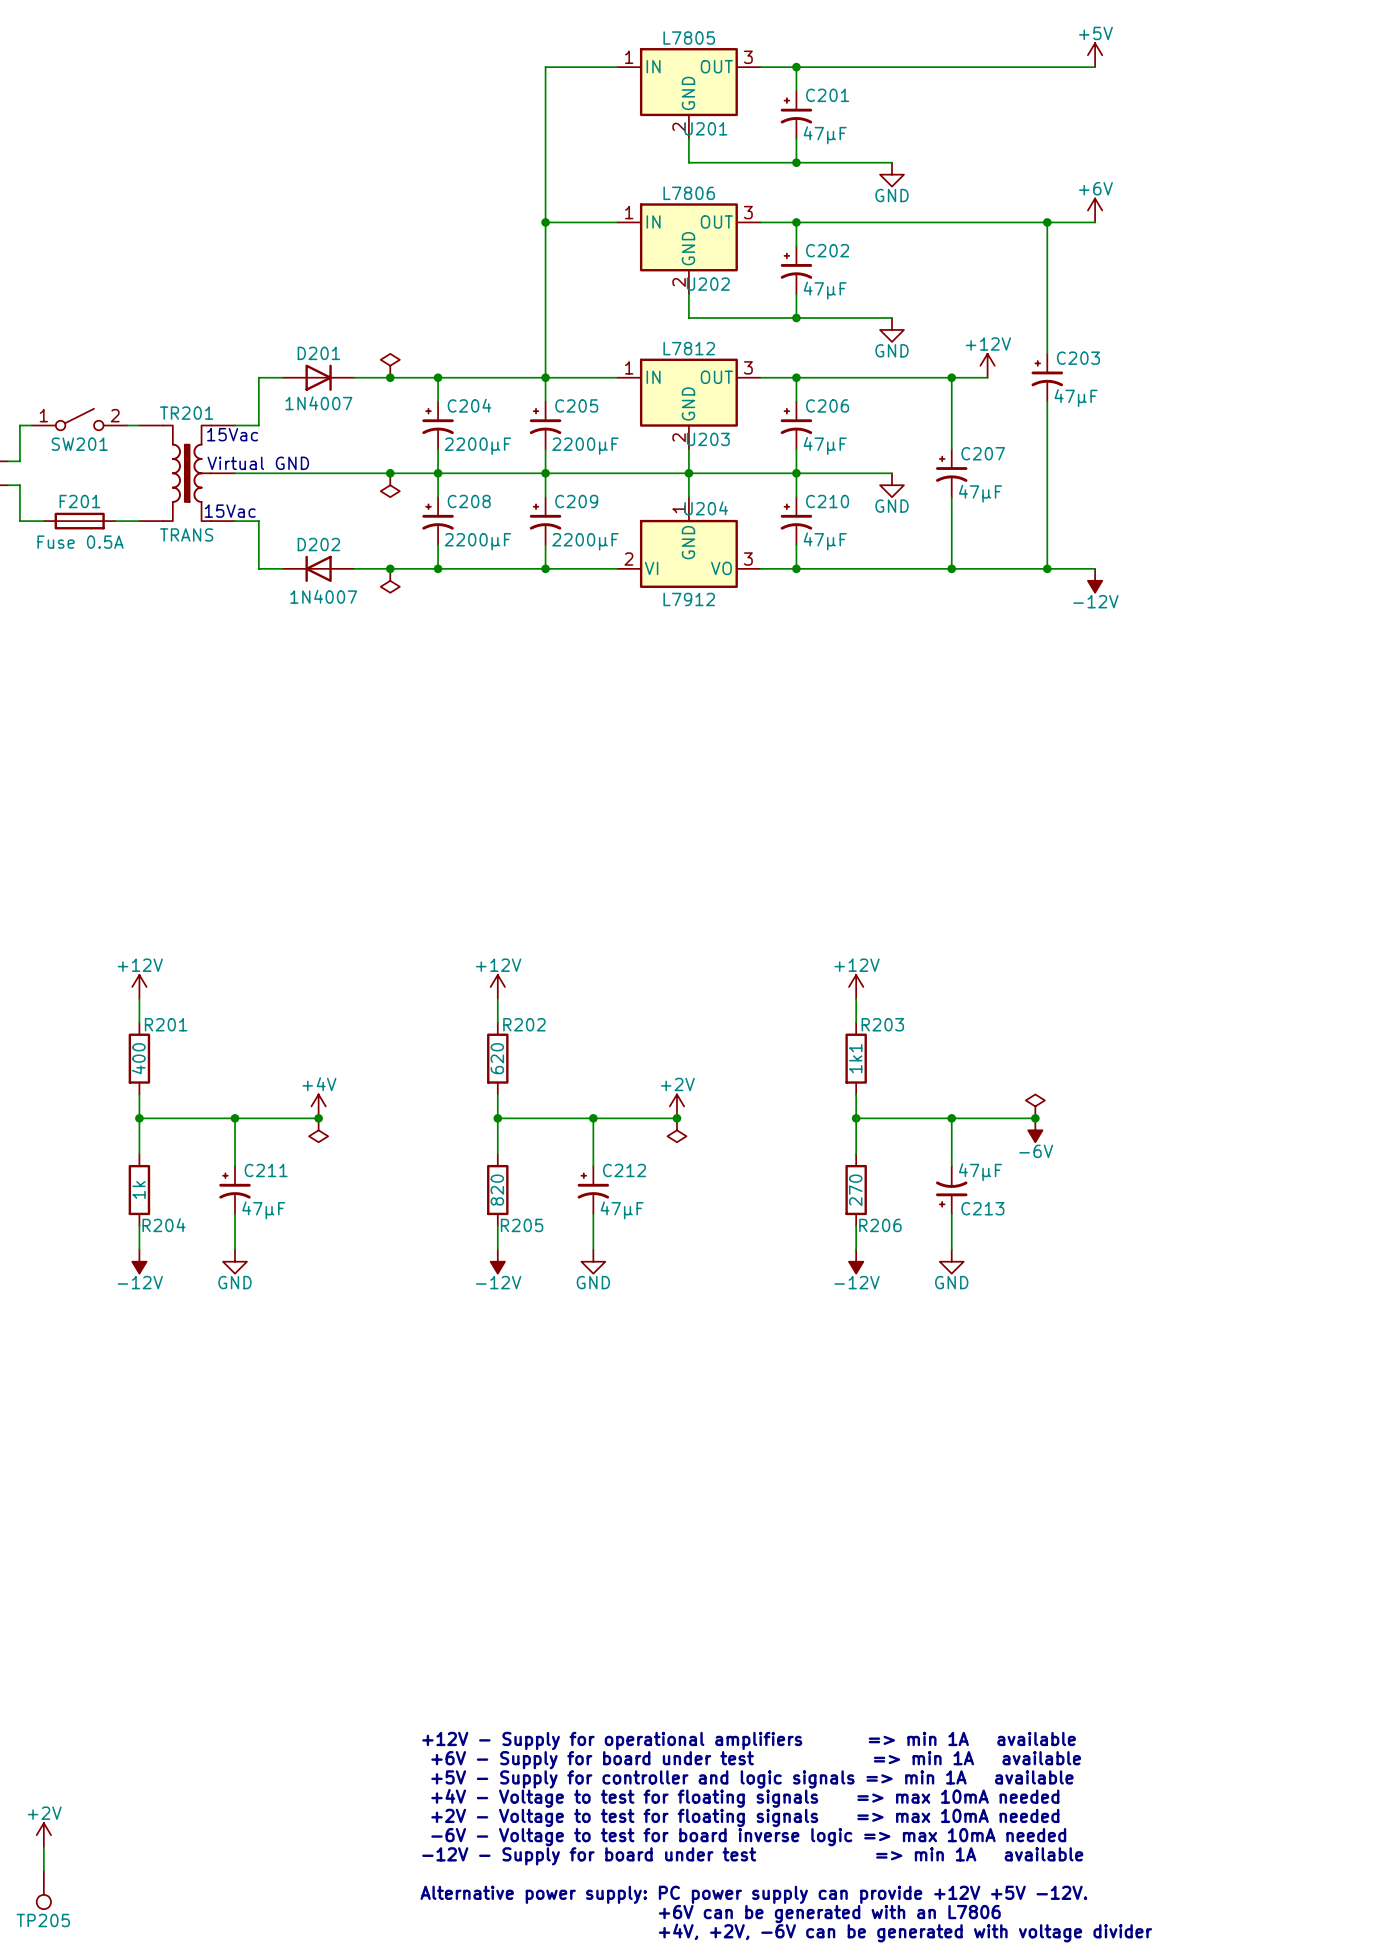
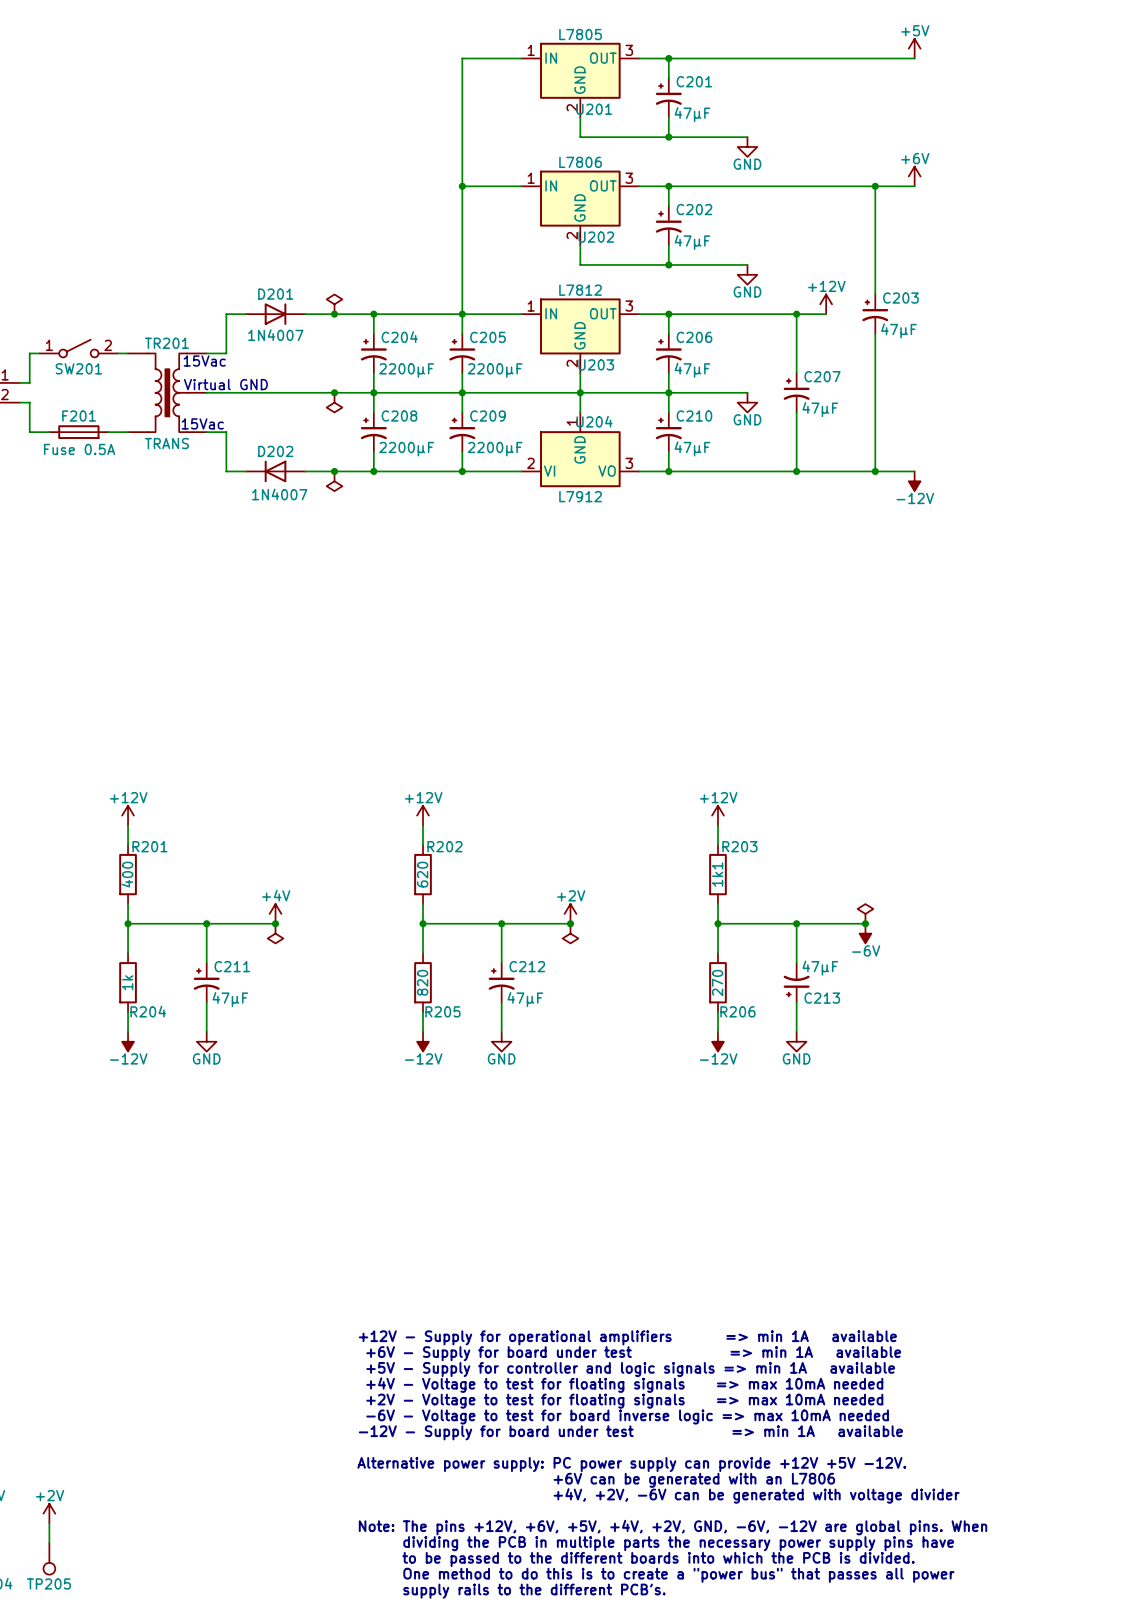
text position: +12V - Supply for operational amplifiers => min 1A available (749, 1740) -> +12V - Supply for operational amplifiers => min 1A available (627, 1337)
text position: +6V - Supply for board under test => min 1A available (756, 1760) -> +6V - Supply for board under test => min 1A available (633, 1353)
text position: +5V - Supply for controller and logic signals => min 1A available (752, 1779) -> +5V - Supply for controller and logic signals => min 1A available (630, 1369)
text position: +4V - Voltage to test for floating signals => max 10mA needed (745, 1798) -> +4V - Voltage to test for floating signals => max 10mA needed (624, 1385)
text position: +2V - Voltage to test for floating signals => max 10mA needed (745, 1817) -> +2V - Voltage to test for floating signals => max 10mA needed (624, 1401)
text position: -6V - Voltage to test for board inverse logic => max 10mA needed (748, 1837) -> -6V - Voltage to test for board inverse logic => max 10mA needed (627, 1417)
text: none -> Note: The pins +12V, +6V, +5V, +4V, +2V, GND, -6V, -12V are global pins. When (673, 1527)
text position: -12V - Supply for board under test => min 1A available (752, 1856) -> -12V - Supply for board under test => min 1A available (630, 1432)
text: none -> dividing the PCB in multiple parts the necessary power supply pins have (678, 1543)
text: none -> to be passed to the different boards into which the PCB is divided. (658, 1559)
text position: Alternative power supply: PC power supply can provide +12V +5V -12V. (753, 1894) -> Alternative power supply: PC power supply can provide +12V +5V -12V. (631, 1464)
text: none -> One method to do this is to create a "power bus" that passes all power (678, 1575)
text position: +6V can be generated with an L7806 (829, 1914) -> +6V can be generated with an L7806 (694, 1480)
text: none -> supply rails to the different PCB's. (534, 1591)
text position: +4V, +2V, -6V can be generated with voltage divider (905, 1932) -> +4V, +2V, -6V can be generated with voltage divider (756, 1495)

